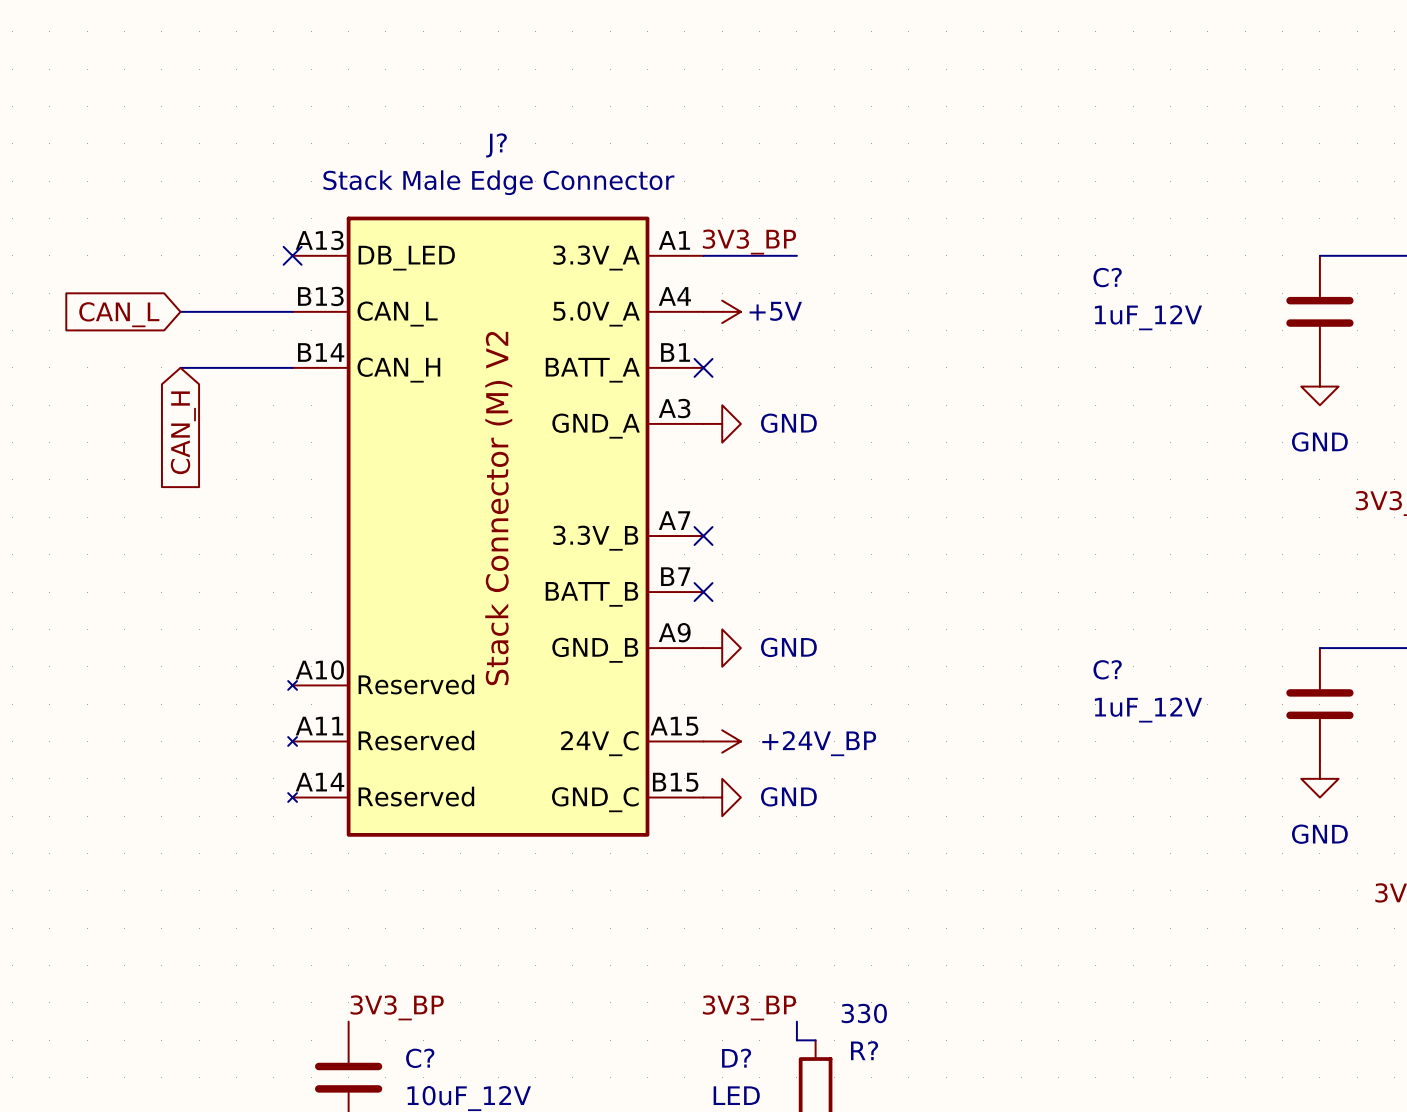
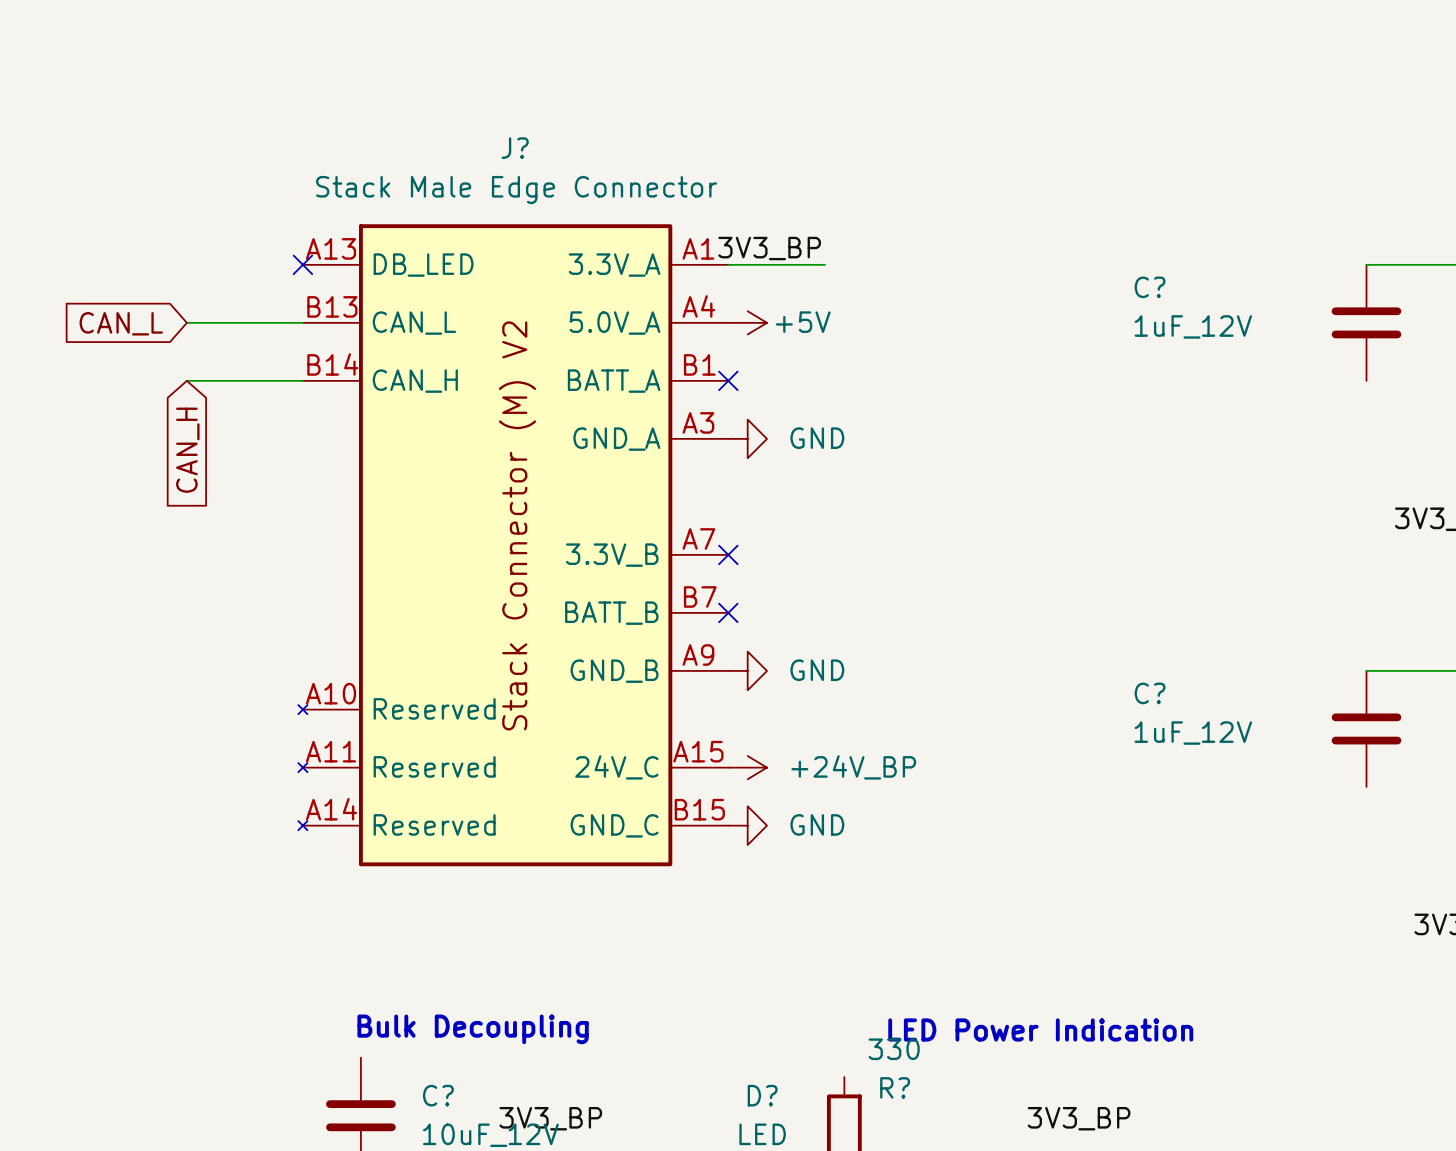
power symbol: GND (1319, 386) -> none
power symbol: GND (1319, 778) -> none
text: none -> Bulk Decoupling (473, 1029)
text: none -> LED Power Indication (1040, 1029)
label position: 3V3_BP (397, 1007) -> 3V3_BP (550, 1118)
label: 3V3_BP (749, 1007) -> none
wire: (796, 1021) (796, 1040) (815, 1040) -> none
label: none -> 3V3_BP (1079, 1118)

